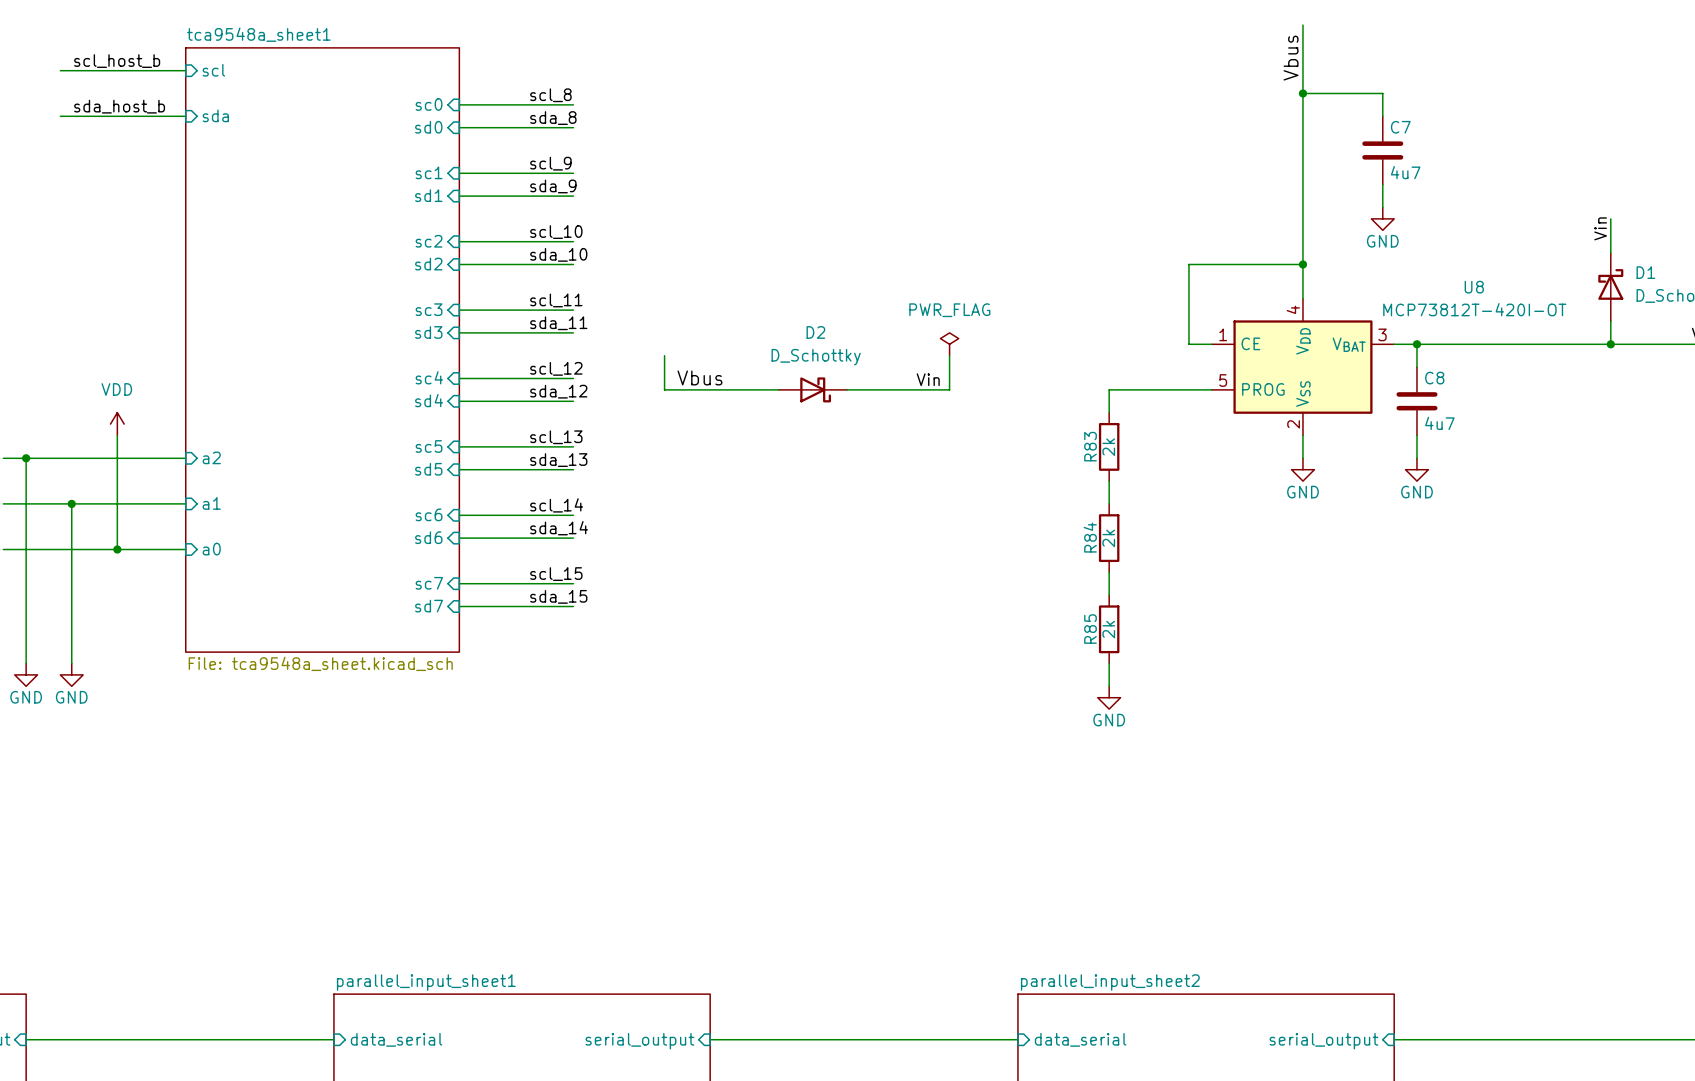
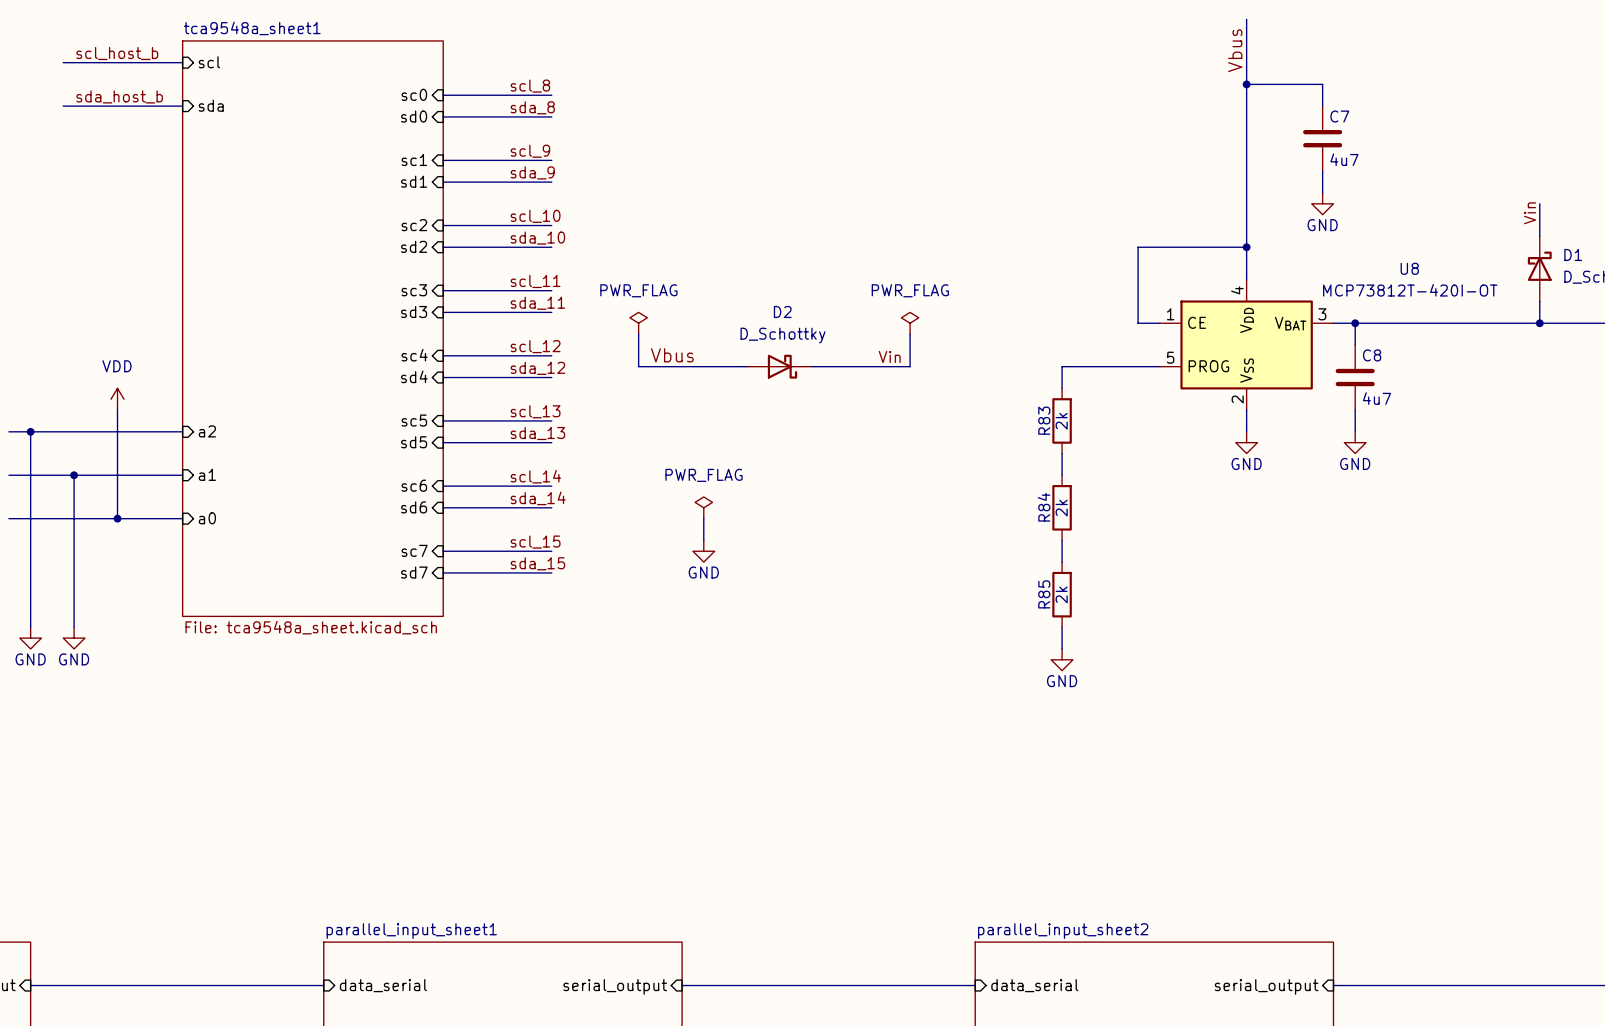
power symbol: none -> PWR_FLAG (638, 323)
power symbol: none -> PWR_FLAG (703, 507)
wire: none -> (703, 518) (703, 540)
power symbol: none -> GND (703, 551)

